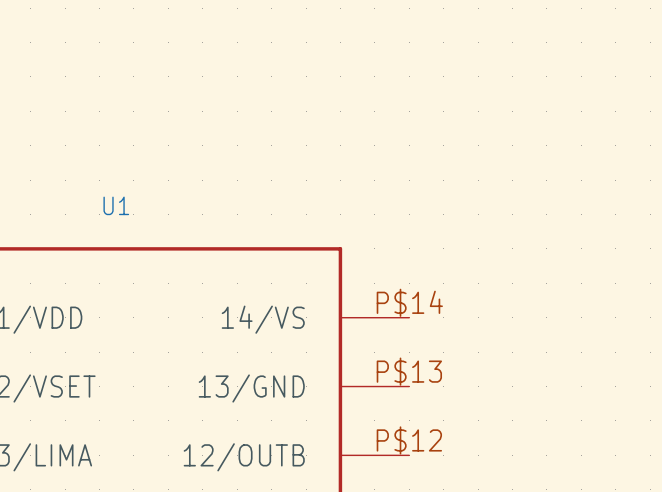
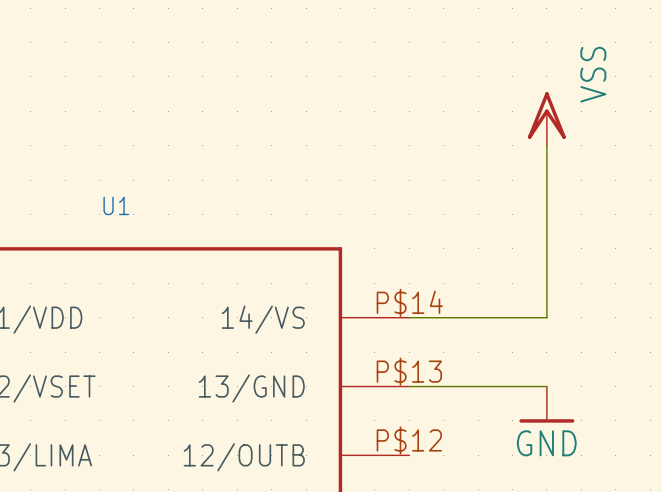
power symbol: none -> VSS (546, 118)
wire: none -> (546, 145) (546, 317) (409, 317)
wire: none -> (409, 386) (546, 386)
power symbol: none -> GND (546, 404)

